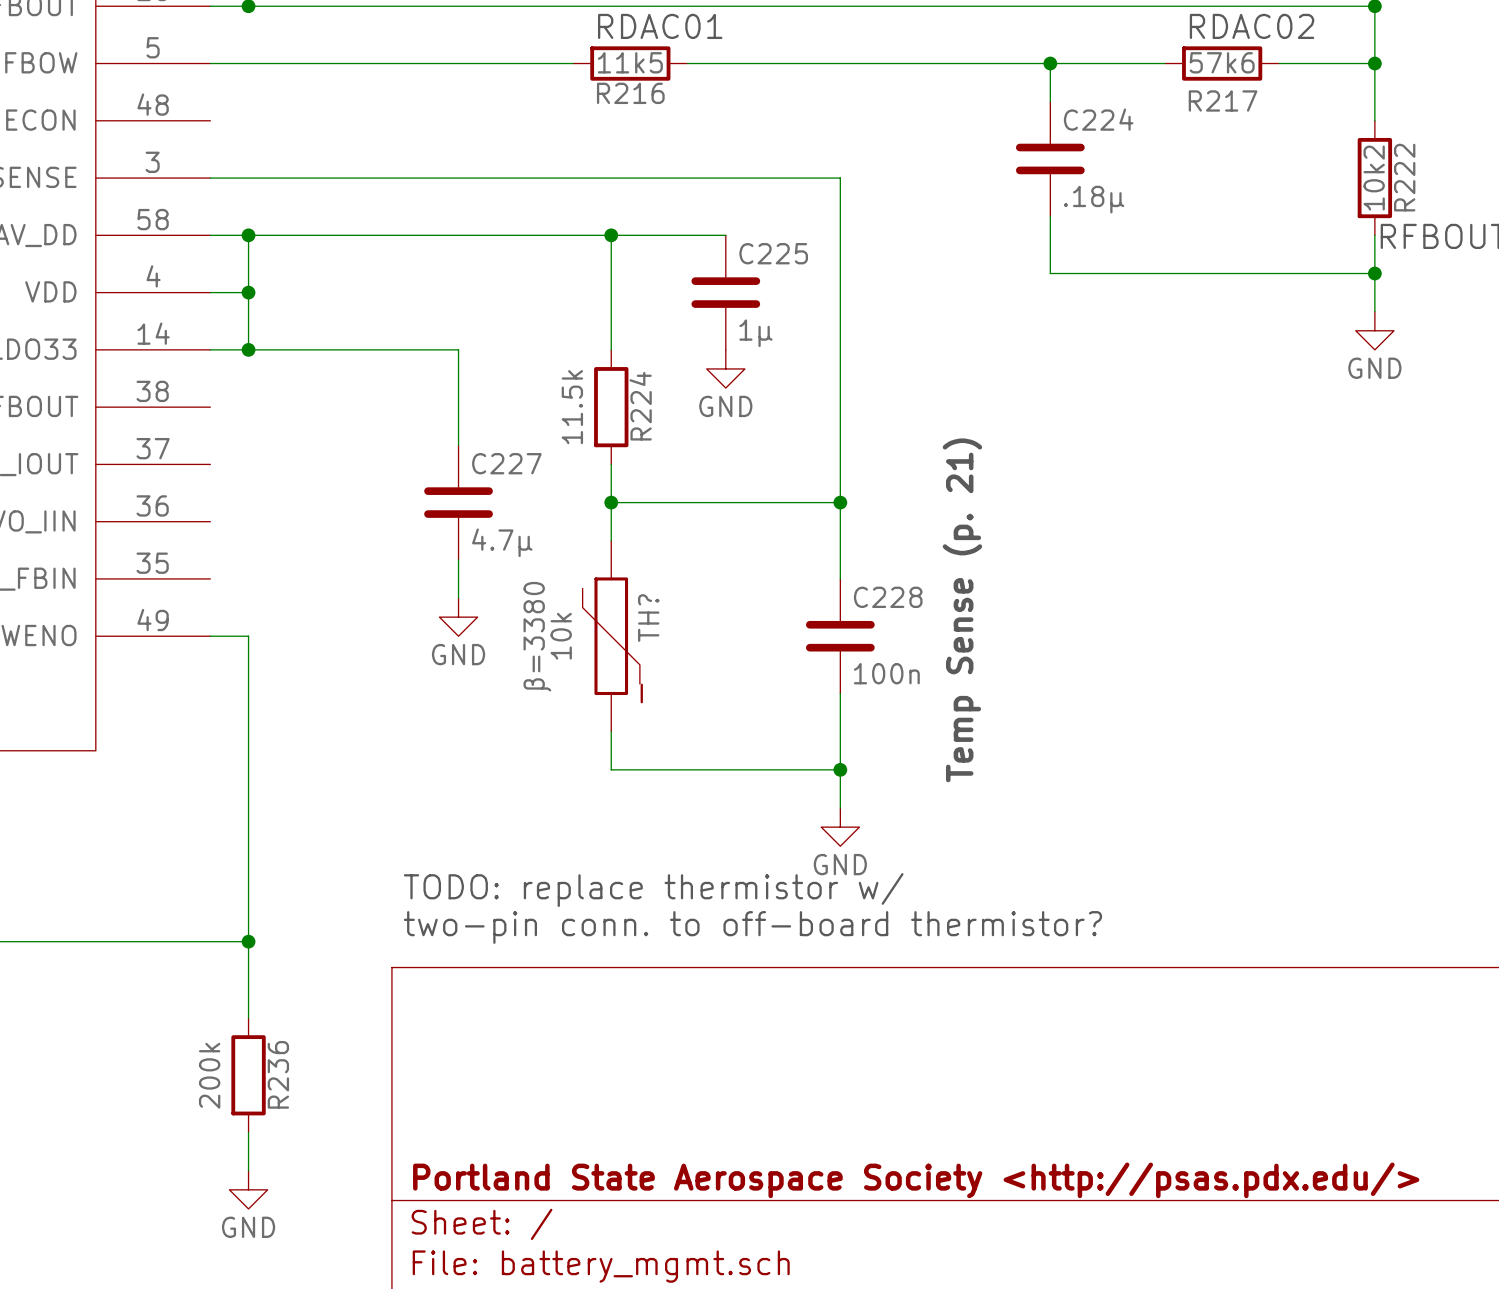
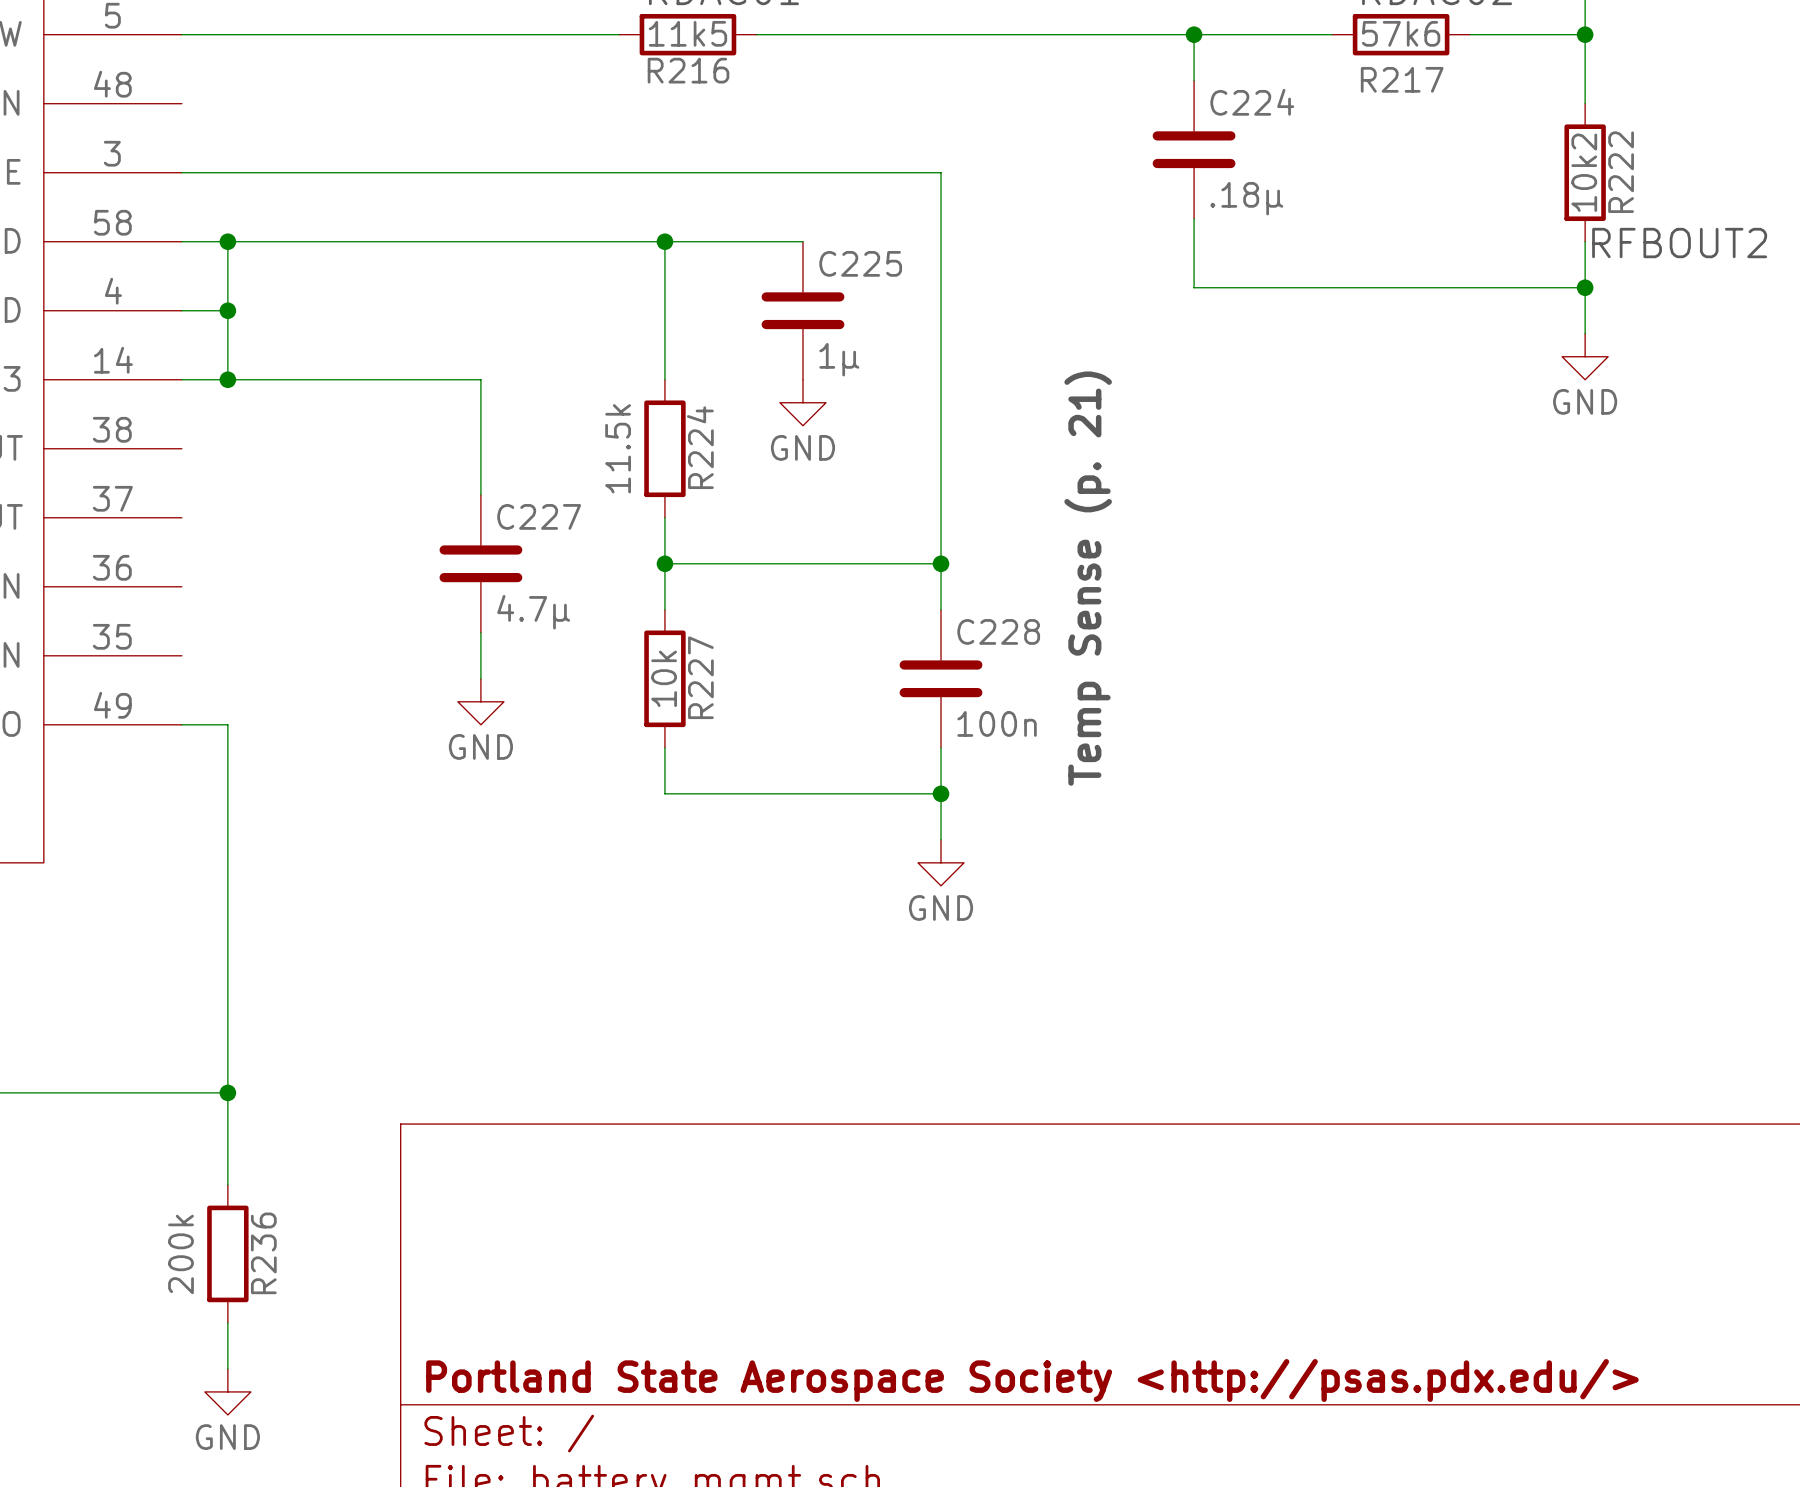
R227: none -> 10k (664, 678)
text position: Temp Sense (p. 21) (962, 610) -> Temp Sense (p. 21) (1088, 578)
TH?: 10k (611, 636) -> none
C228 position: (840, 636) -> (941, 678)
wire: none -> (664, 747) (664, 793) (941, 793) (941, 747)
wire: (611, 731) (611, 769) (840, 769) -> none
wire: (840, 731) (840, 808) -> none
junction position: (840, 769) -> (941, 793)
power symbol position: GND (840, 827) -> GND (941, 862)
text: TODO: replace thermistor w/ (653, 890) -> none
text: two-pin conn. to off-board thermistor? (752, 927) -> none

